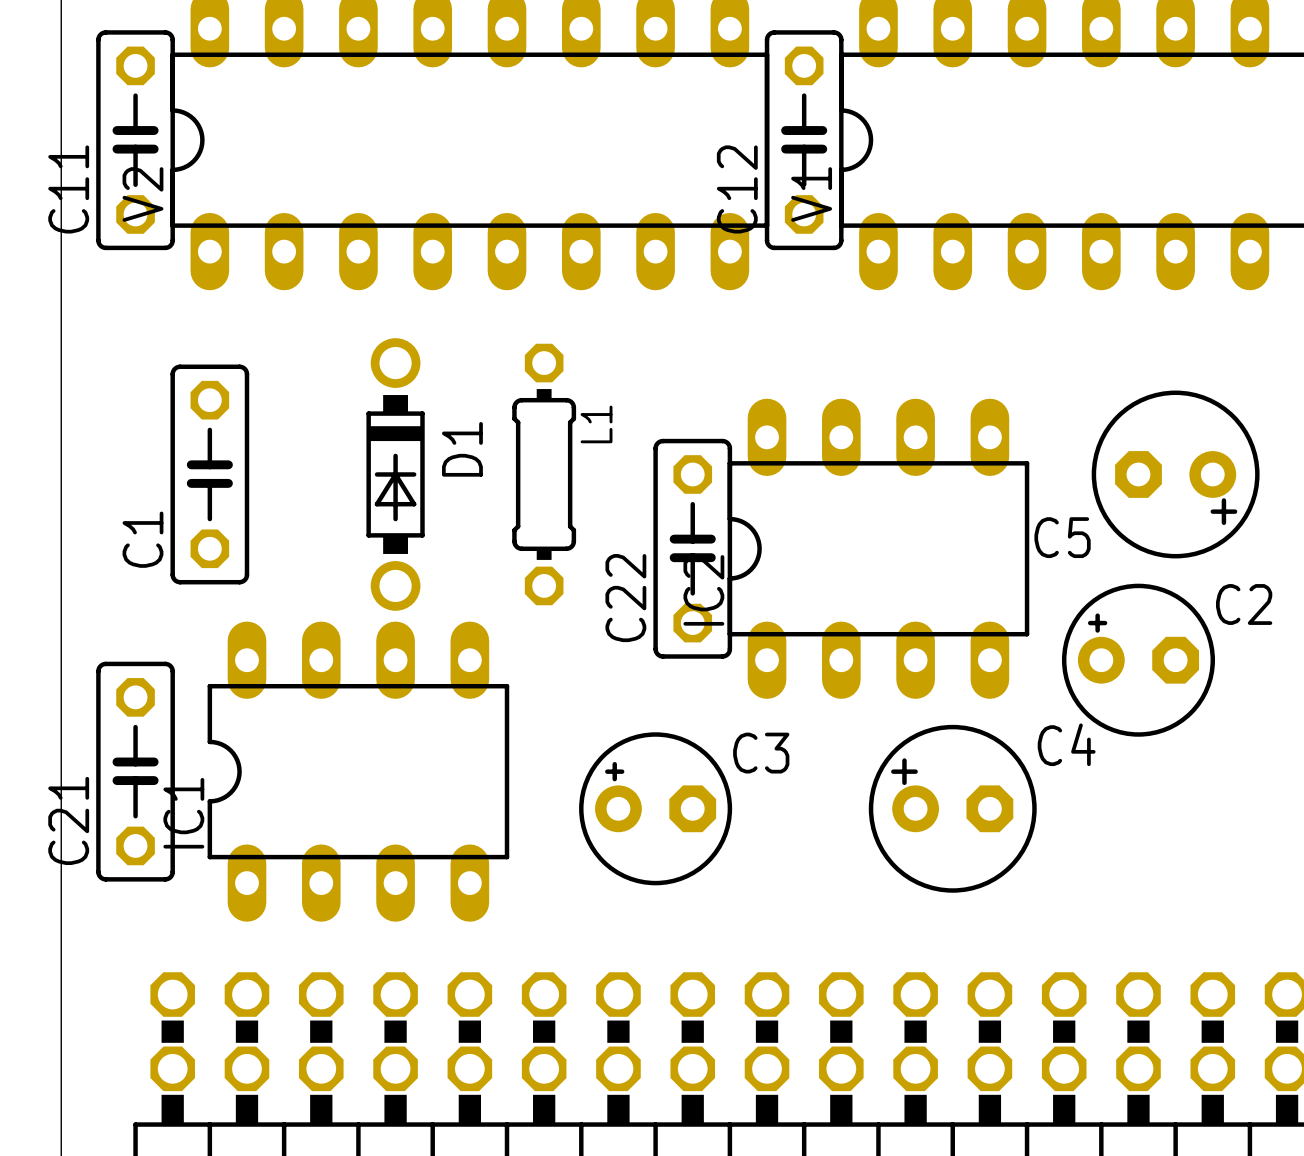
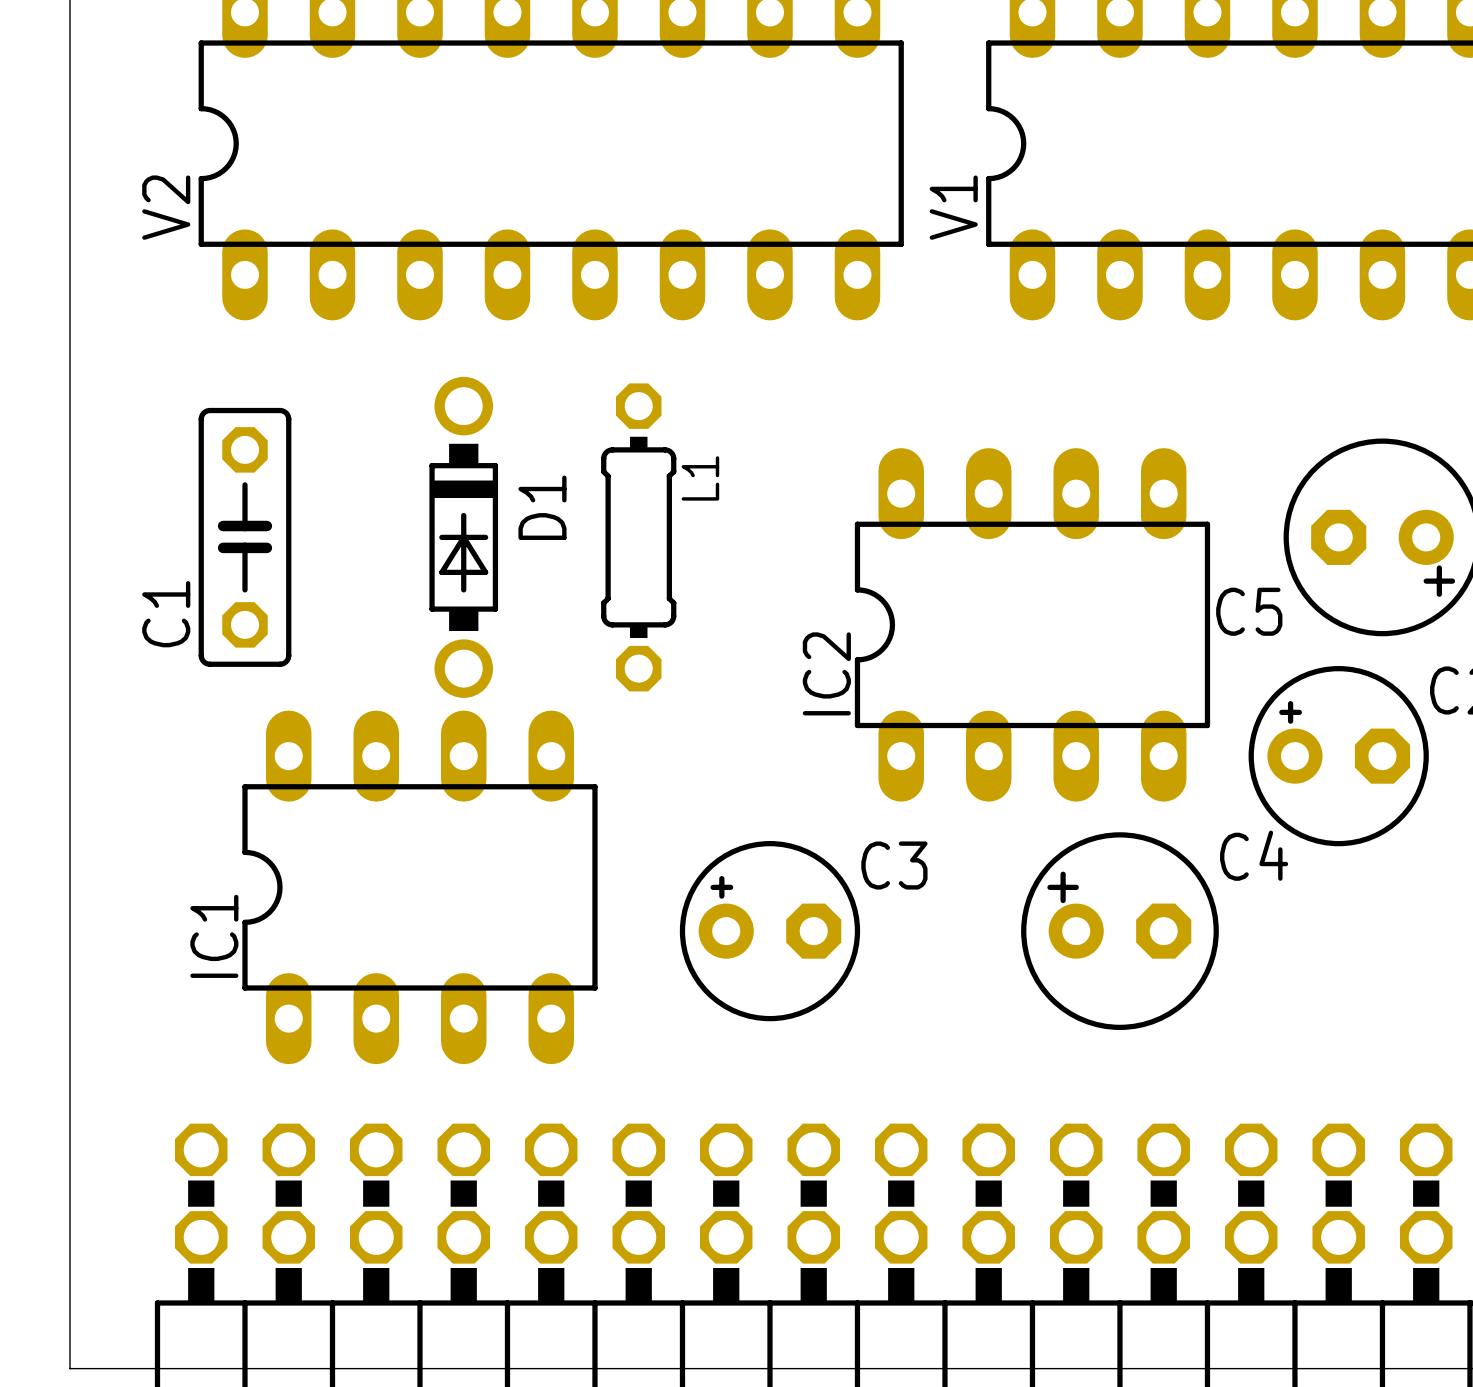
C11: (135, 140) -> none
C12: (804, 140) -> none
C22: (692, 548) -> none
C21: (135, 771) -> none

